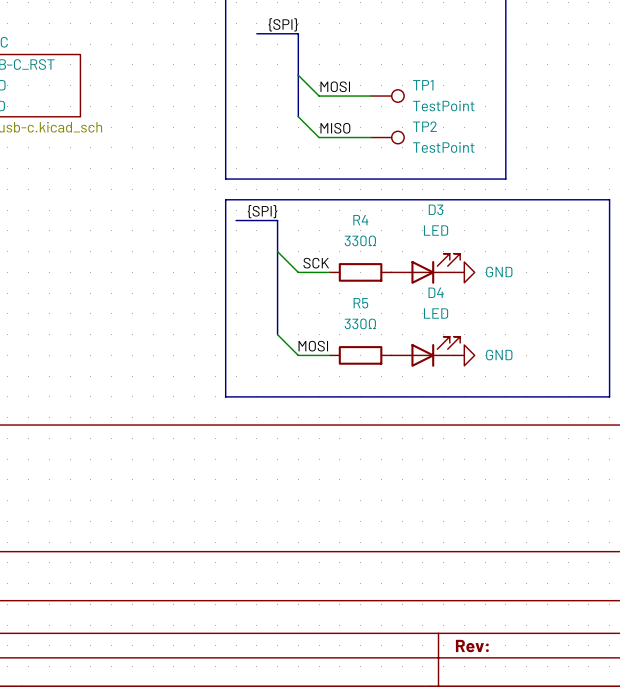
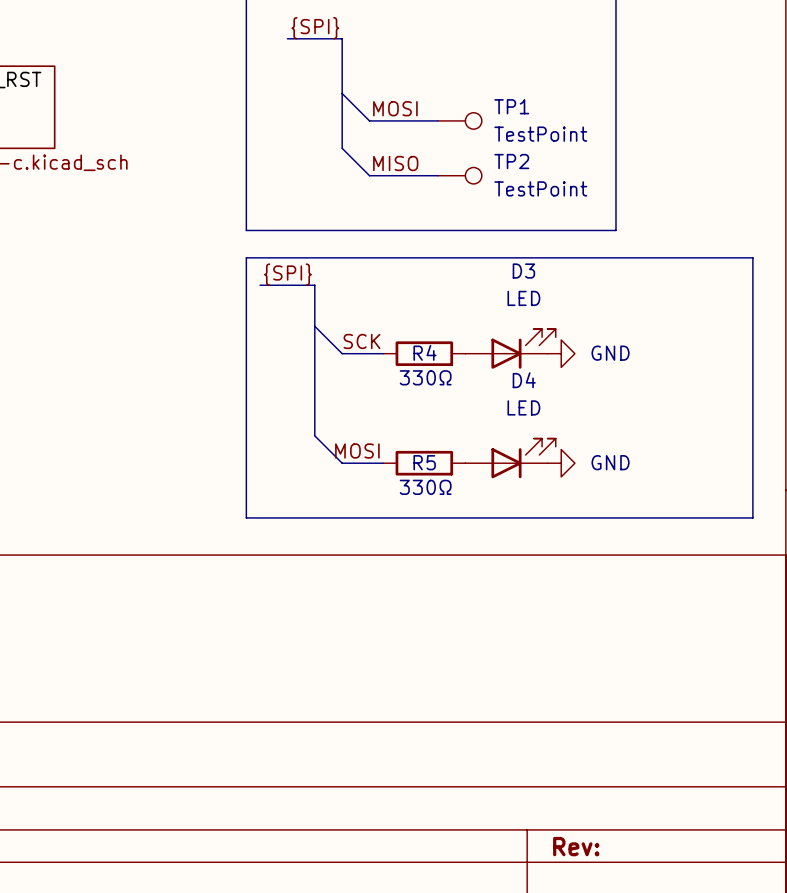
R4 name position: R4 (360, 220) -> R4 (424, 352)
R4 value position: 330Ω (360, 240) -> 330Ω (425, 377)
R5 name position: R5 (360, 303) -> R5 (424, 462)
R5 value position: 330Ω (360, 323) -> 330Ω (425, 487)

